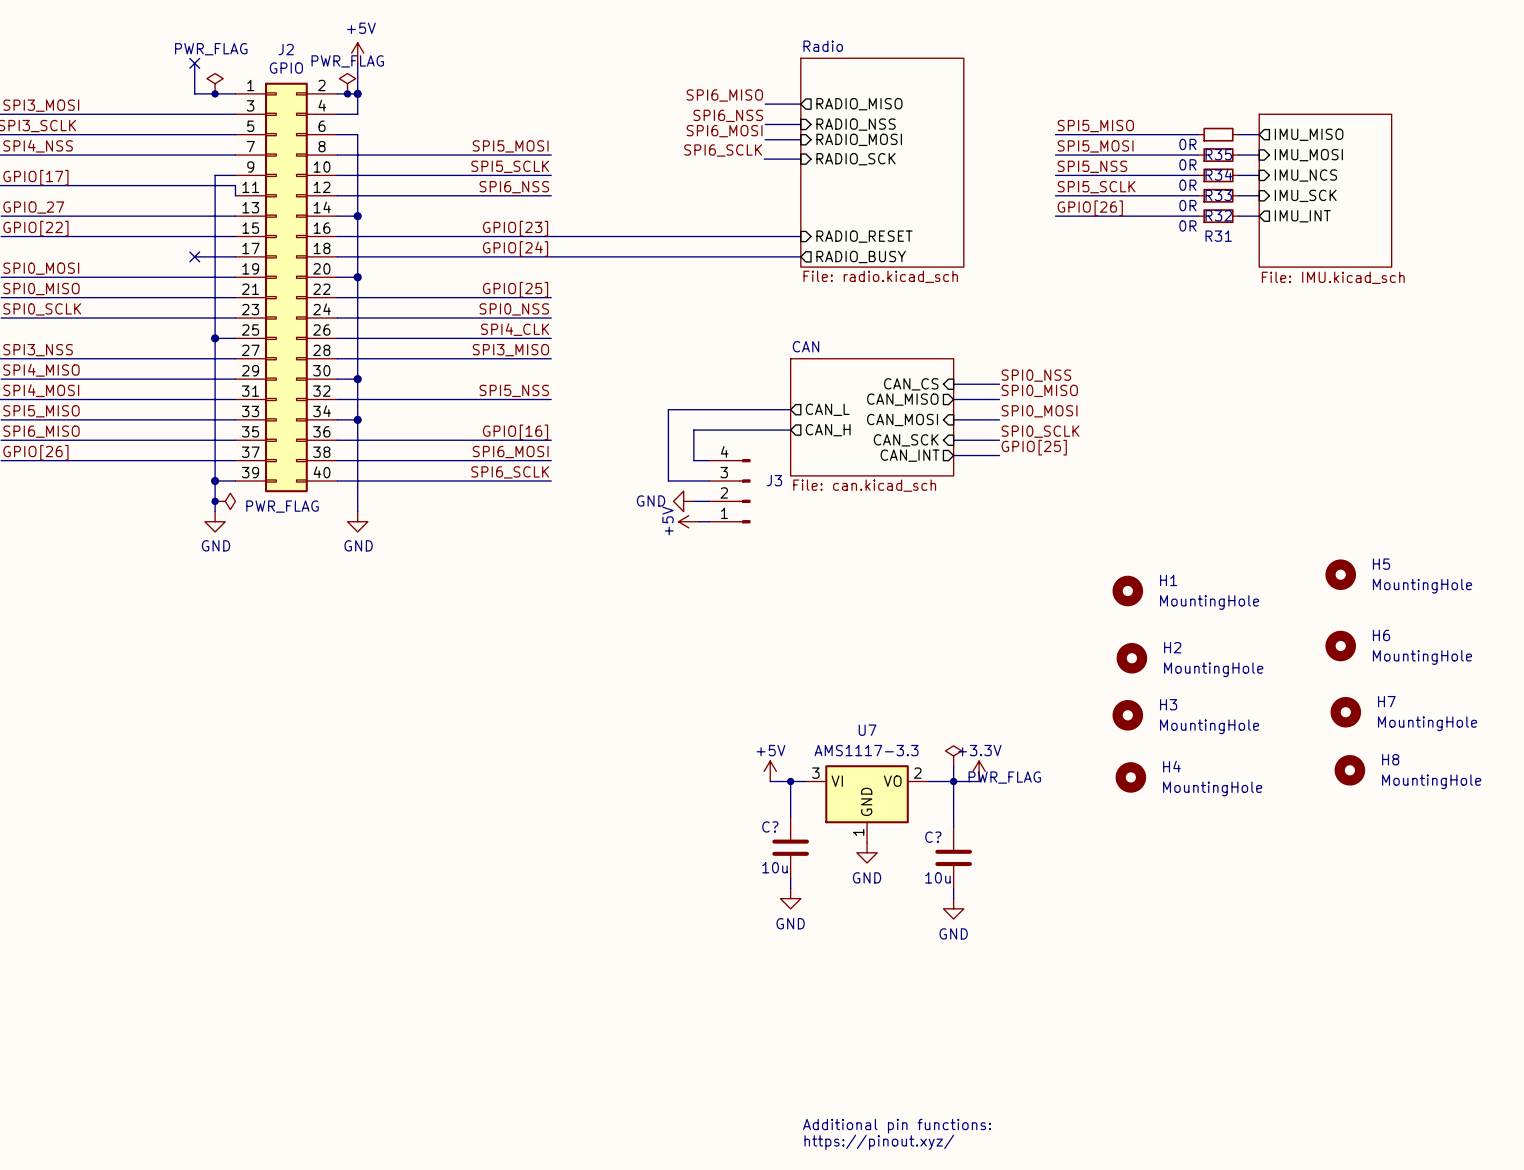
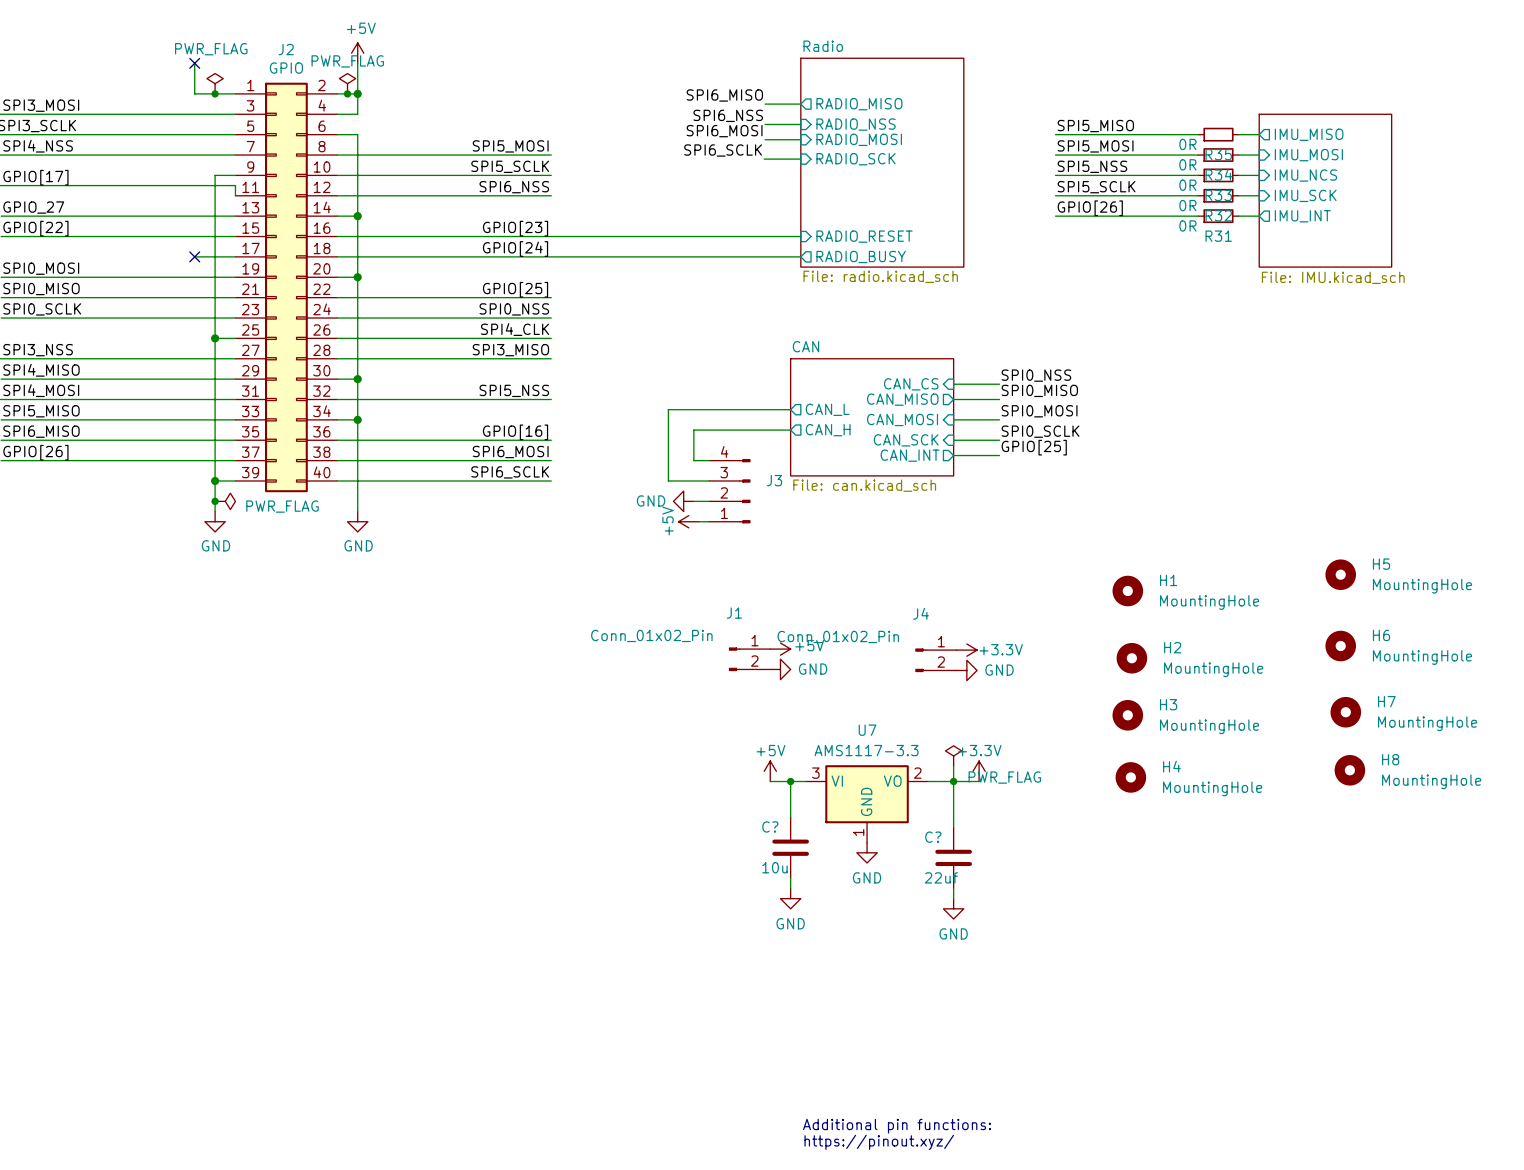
power symbol: none -> +5V (780, 649)
power symbol: none -> +3.3V (966, 650)
J1: none -> Conn_01x02_Pin (749, 659)
J4: none -> Conn_01x02_Pin (936, 660)
power symbol: none -> GND (780, 669)
power symbol: none -> GND (966, 670)
C? value: 10u (937, 877) -> 22uf (941, 877)

